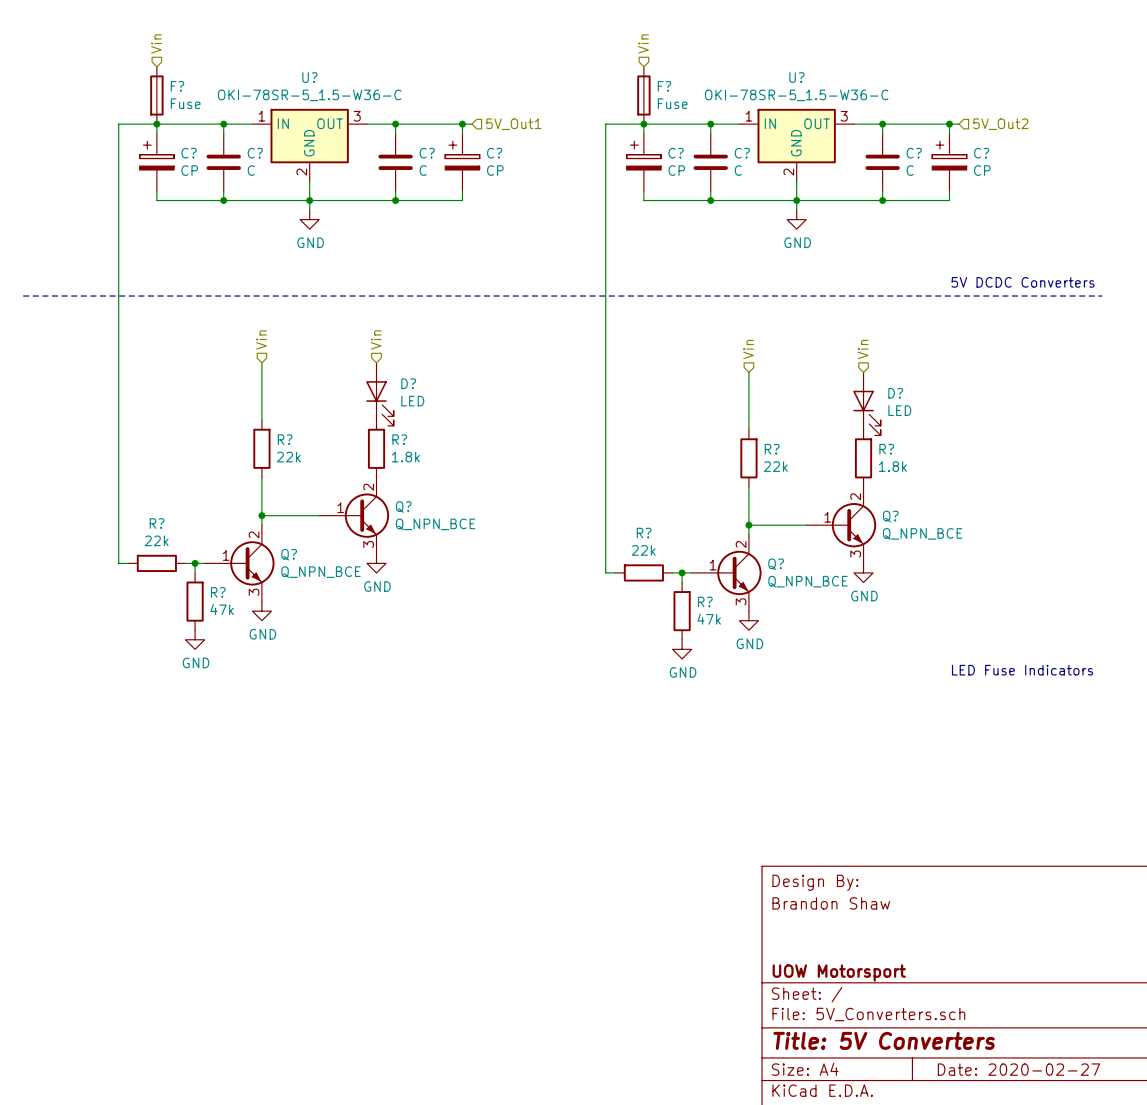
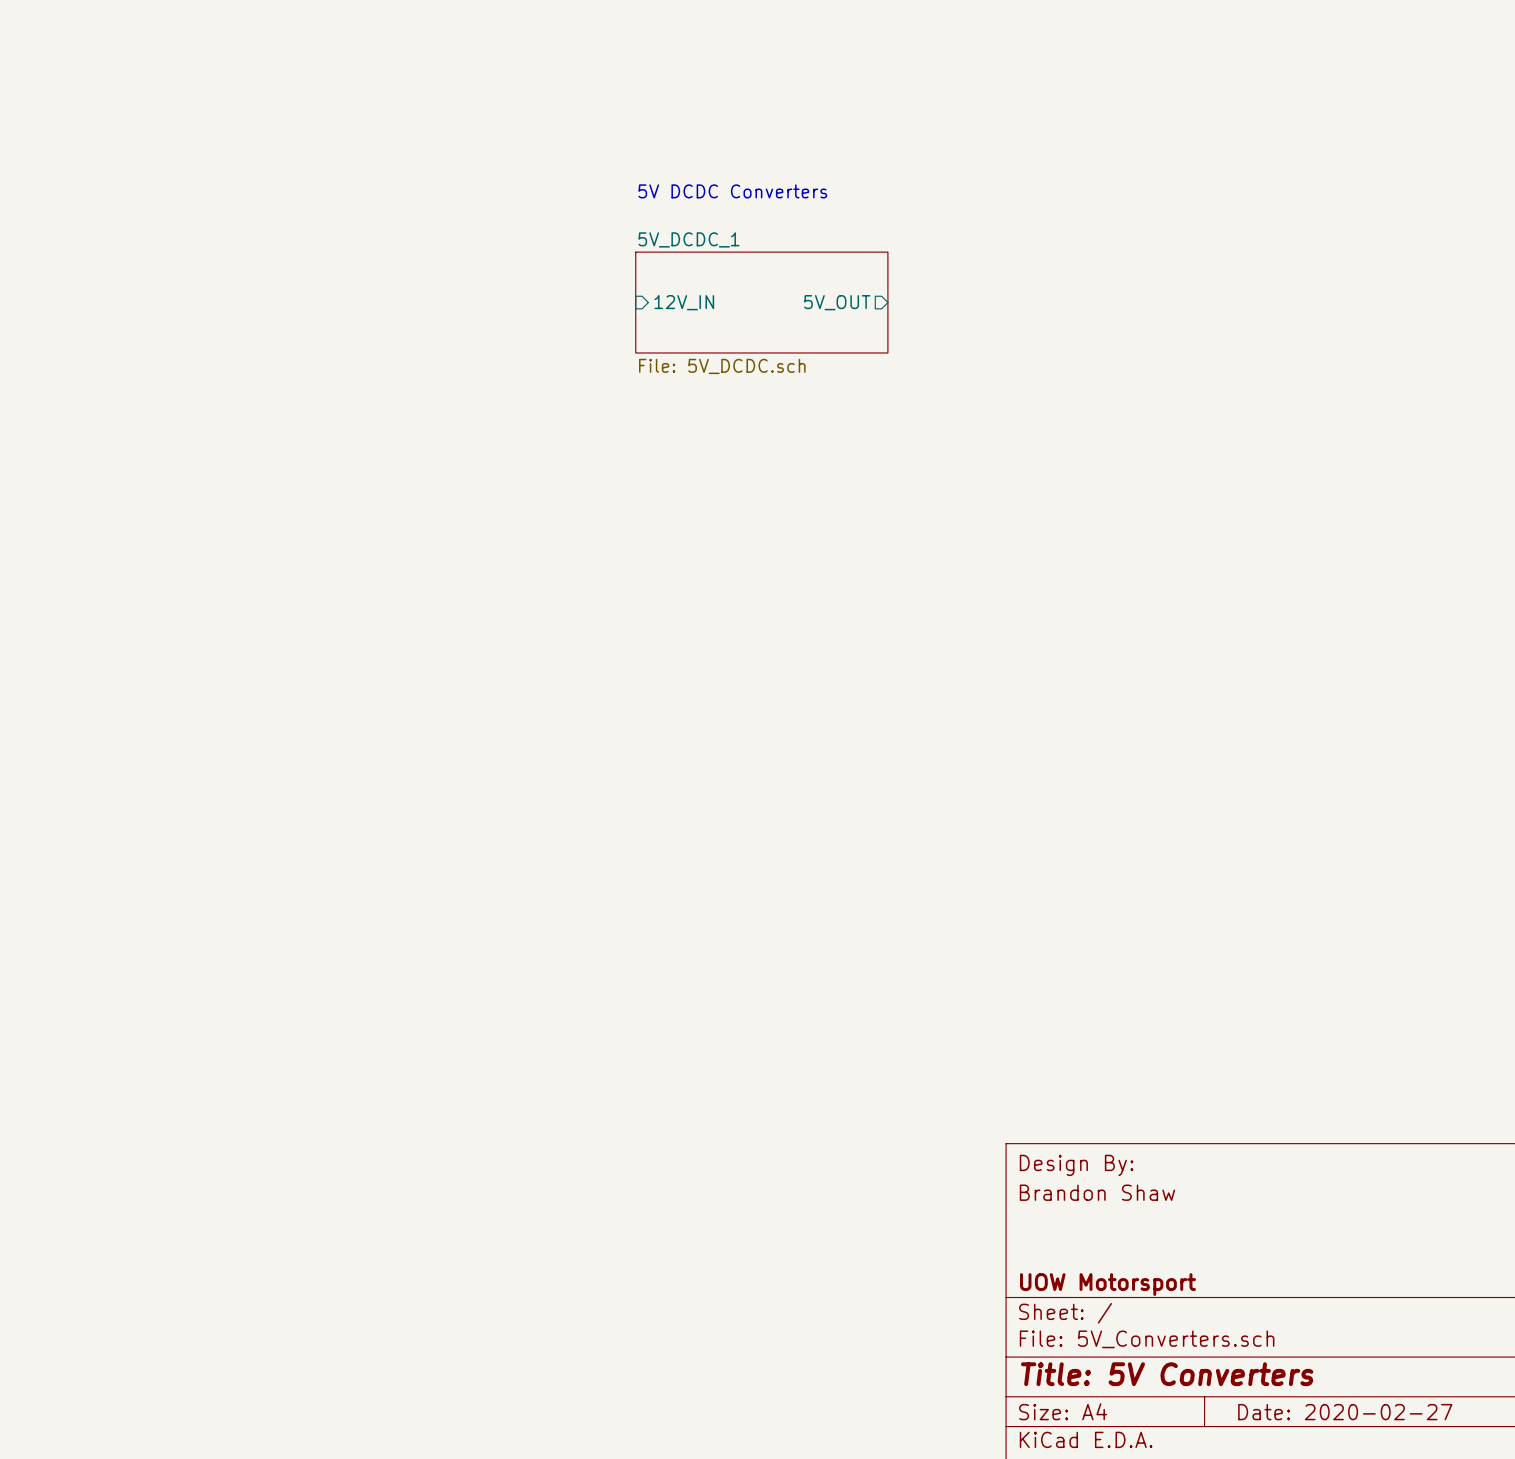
hierarchical label: Vin (156, 43) -> none
hierarchical label: Vin (643, 43) -> none
F?: Fuse (156, 95) -> none
F?: Fuse (643, 95) -> none
wire: (156, 124) (156, 133) -> none
junction: (156, 124) -> none
wire: (223, 124) (223, 133) -> none
junction: (223, 124) -> none
wire: (252, 124) (118, 124) (118, 563) (128, 563) -> none
wire: (366, 124) (472, 124) -> none
wire: (395, 124) (395, 133) -> none
junction: (395, 124) -> none
wire: (462, 124) (462, 133) -> none
junction: (462, 124) -> none
hierarchical label: 5V_Out1 (513, 124) -> none
wire: (643, 124) (643, 133) -> none
junction: (643, 124) -> none
wire: (710, 124) (710, 133) -> none
junction: (710, 124) -> none
wire: (739, 124) (605, 124) (605, 572) (615, 572) -> none
wire: (853, 124) (959, 124) -> none
wire: (882, 124) (882, 133) -> none
junction: (882, 124) -> none
wire: (949, 124) (949, 133) -> none
junction: (949, 124) -> none
hierarchical label: 5V_Out2 (1000, 124) -> none
text: none -> 5V DCDC Converters (732, 191)
U?: OKI-78SR-5_1.5-W36-C (309, 145) -> none
U?: OKI-78SR-5_1.5-W36-C (796, 145) -> none
C?: CP (156, 162) -> none
C?: C (223, 162) -> none
C?: C (395, 162) -> none
C?: CP (462, 162) -> none
C?: CP (643, 162) -> none
C?: C (710, 162) -> none
C?: C (882, 162) -> none
C?: CP (949, 162) -> none
wire: (309, 181) (309, 210) -> none
wire: (796, 181) (796, 210) -> none
wire: (156, 190) (156, 200) (462, 200) (462, 190) -> none
wire: (223, 190) (223, 200) -> none
wire: (395, 190) (395, 200) -> none
wire: (643, 190) (643, 200) (949, 200) (949, 190) -> none
wire: (710, 190) (710, 200) -> none
wire: (882, 190) (882, 200) -> none
junction: (223, 200) -> none
junction: (309, 200) -> none
junction: (395, 200) -> none
junction: (710, 200) -> none
junction: (796, 200) -> none
junction: (882, 200) -> none
power symbol: GND (309, 219) -> none
power symbol: GND (796, 219) -> none
sheet pin: none -> 12V_IN (684, 302)
sheet 5V_DCDC_1: none -> File: 5V_DCDC.sch (761, 302)
sheet pin: none -> 5V_OUT (837, 302)
text: 5V DCDC Converters (1022, 282) -> none
line: (23, 296) (1102, 296) -> none
hierarchical label: Vin (261, 339) -> none
hierarchical label: Vin (376, 339) -> none
hierarchical label: Vin (748, 349) -> none
hierarchical label: Vin (863, 349) -> none
wire: (261, 362) (261, 420) -> none
wire: (748, 372) (748, 429) -> none
D?: LED (379, 394) -> none
D?: LED (866, 403) -> none
R?: 22k (261, 448) -> none
R?: 1.8k (376, 448) -> none
R?: 22k (748, 458) -> none
R?: 1.8k (863, 458) -> none
wire: (261, 477) (261, 525) -> none
wire: (748, 487) (748, 534) -> none
wire: (261, 515) (319, 515) -> none
junction: (261, 515) -> none
Q?: Q_NPN_BCE (354, 515) -> none
wire: (748, 525) (806, 525) -> none
junction: (748, 525) -> none
Q?: Q_NPN_BCE (841, 525) -> none
R?: 22k (156, 563) -> none
wire: (185, 563) (204, 563) -> none
wire: (195, 563) (195, 572) -> none
junction: (195, 563) -> none
Q?: Q_NPN_BCE (239, 563) -> none
power symbol: GND (376, 563) -> none
R?: 22k (643, 572) -> none
wire: (672, 572) (691, 572) -> none
wire: (682, 572) (682, 582) -> none
junction: (682, 572) -> none
Q?: Q_NPN_BCE (726, 572) -> none
power symbol: GND (863, 572) -> none
R?: 47k (195, 601) -> none
power symbol: GND (261, 611) -> none
R?: 47k (682, 611) -> none
power symbol: GND (748, 620) -> none
power symbol: GND (195, 639) -> none
power symbol: GND (682, 649) -> none
text: LED Fuse Indicators (1022, 670) -> none

